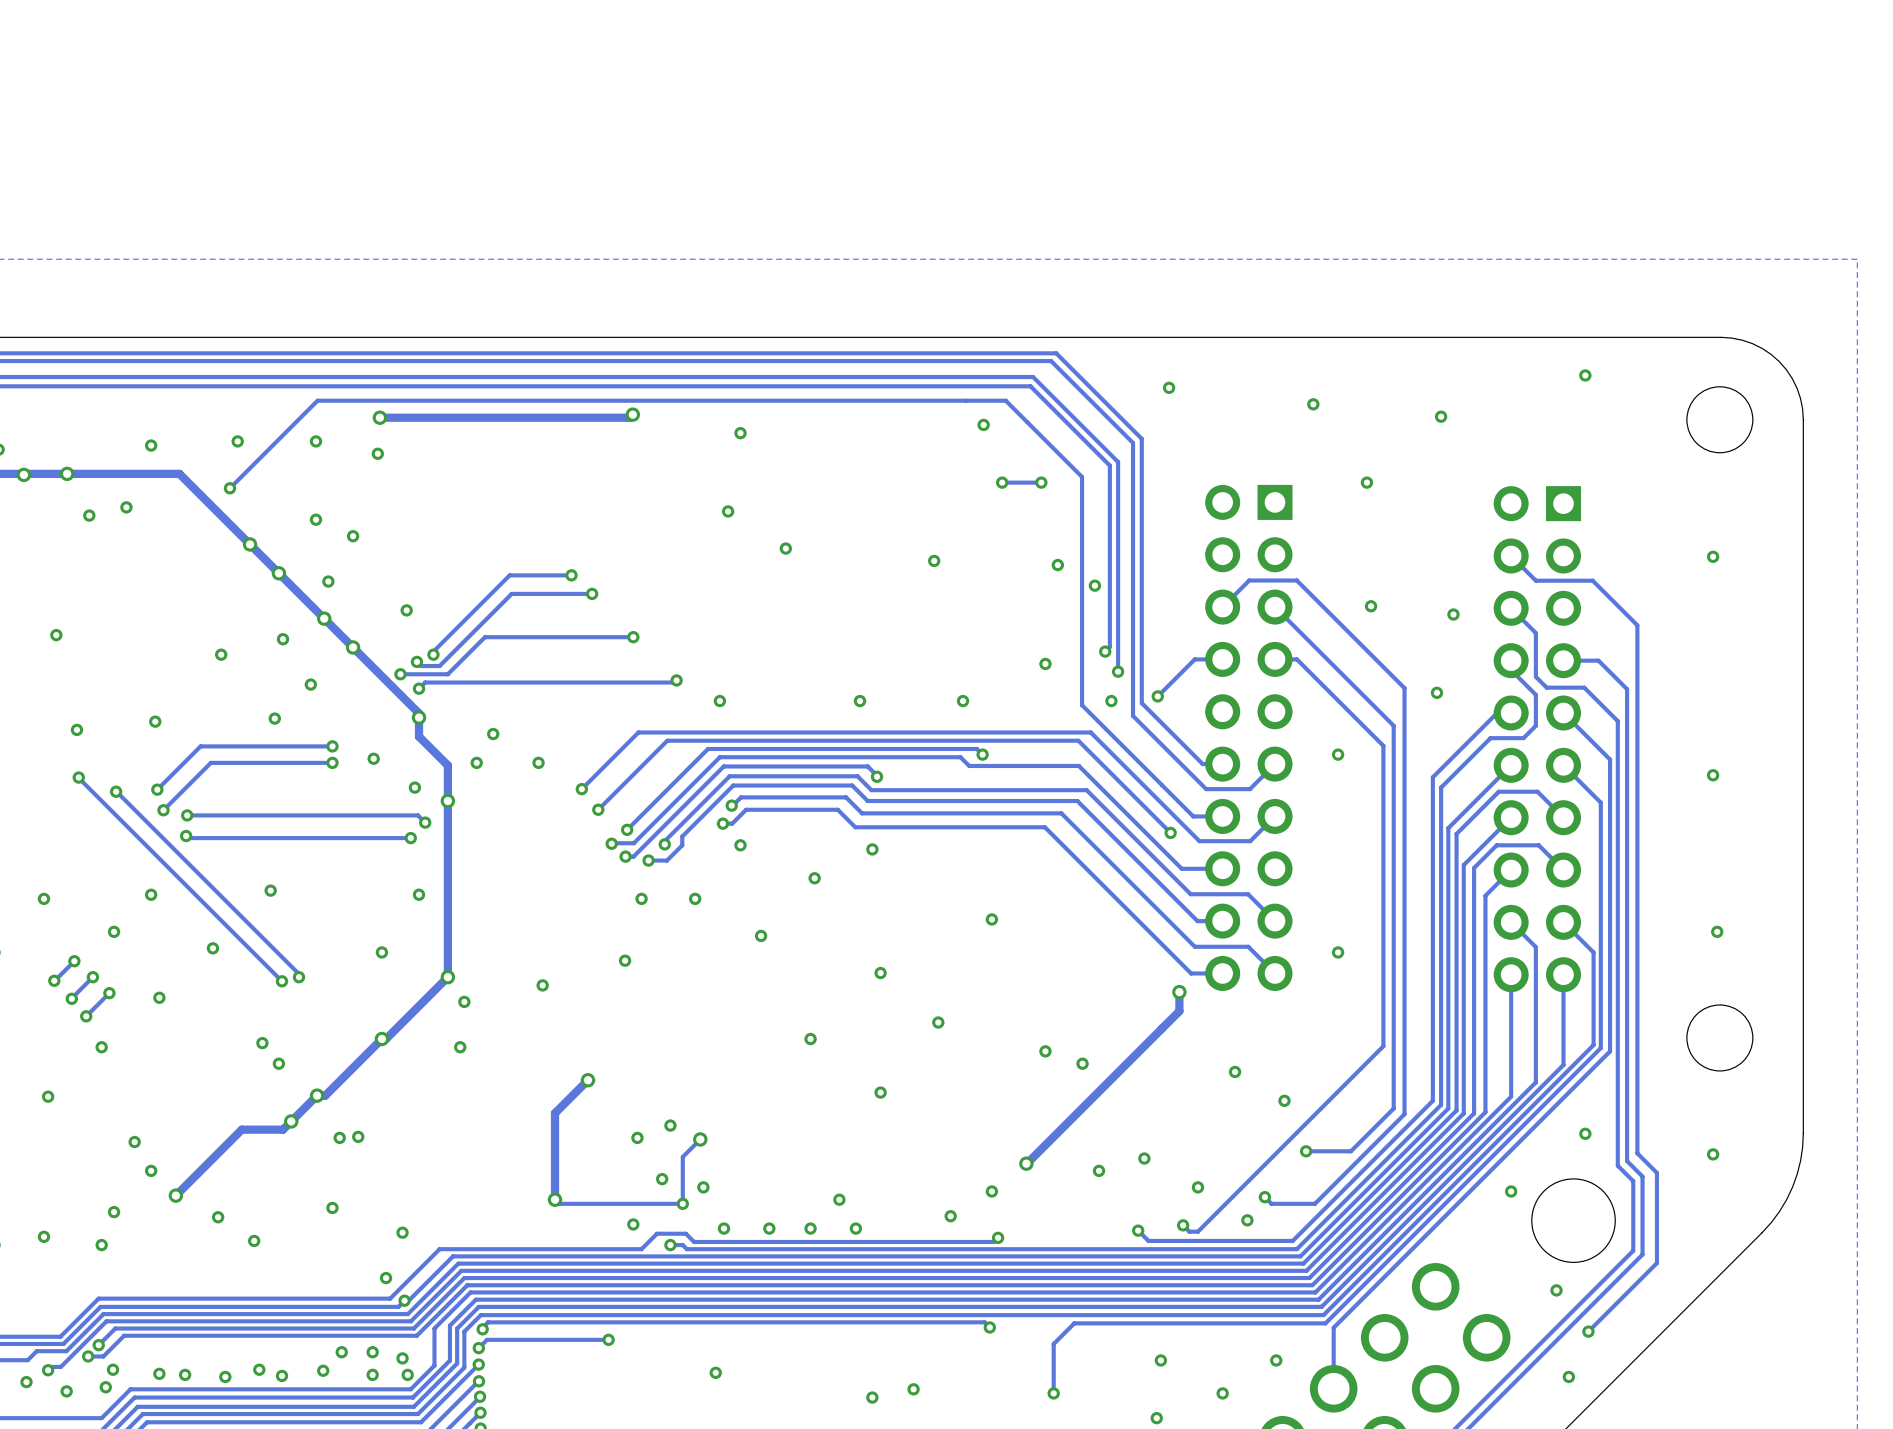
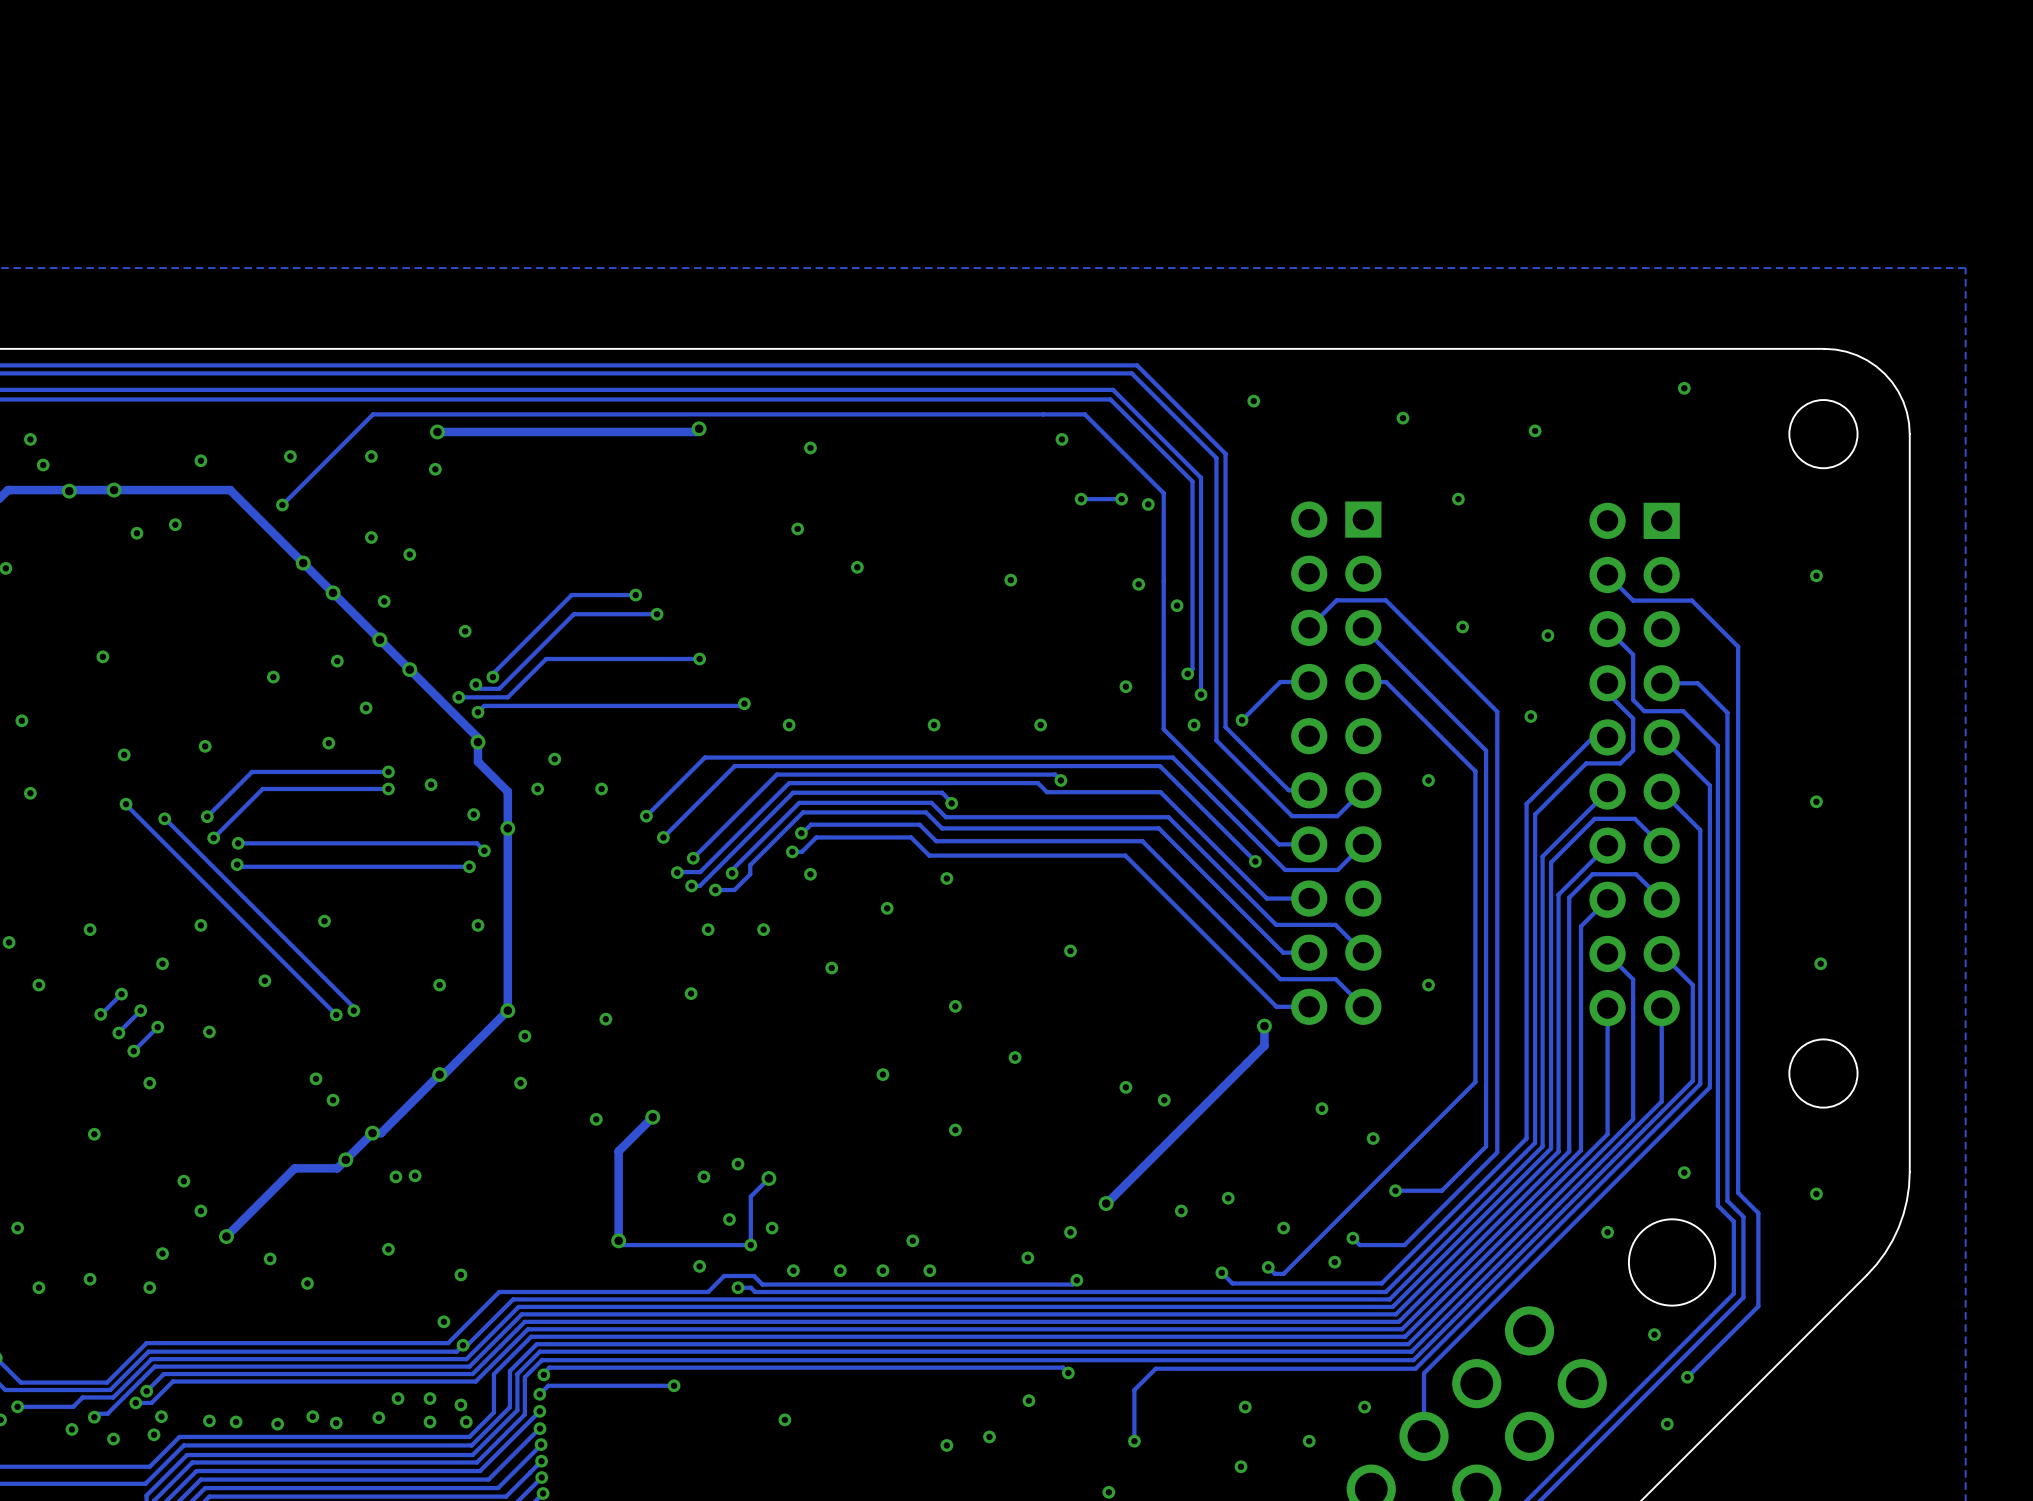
via: none -> (1148, 504)
via: none -> (596, 1119)
via: none -> (1028, 1400)

